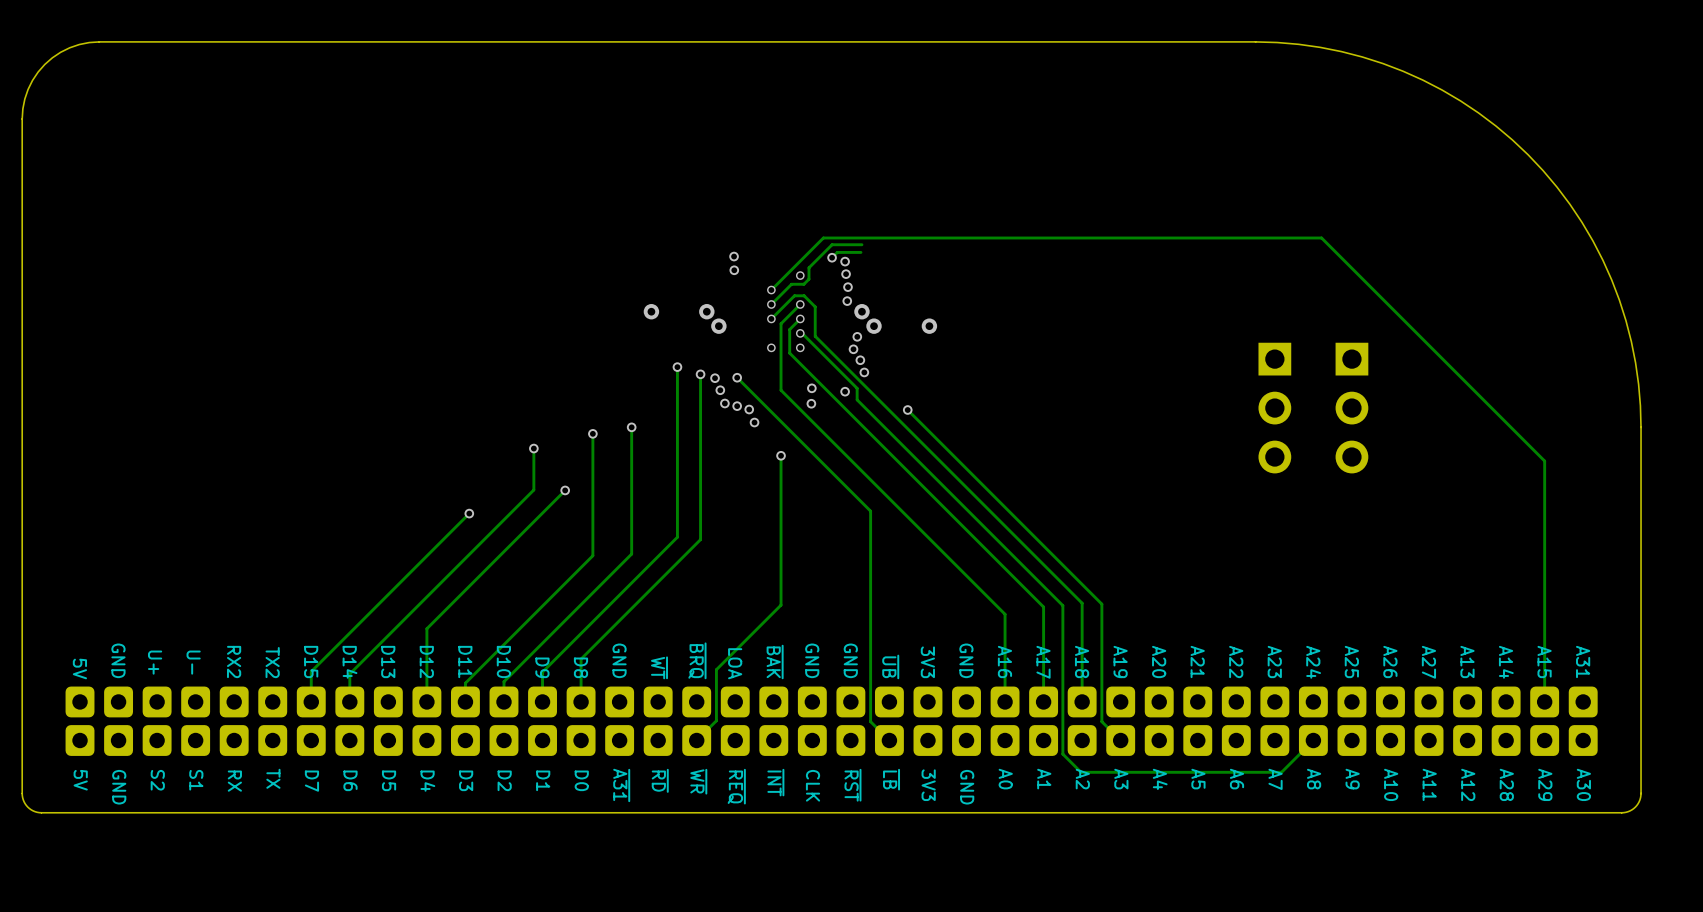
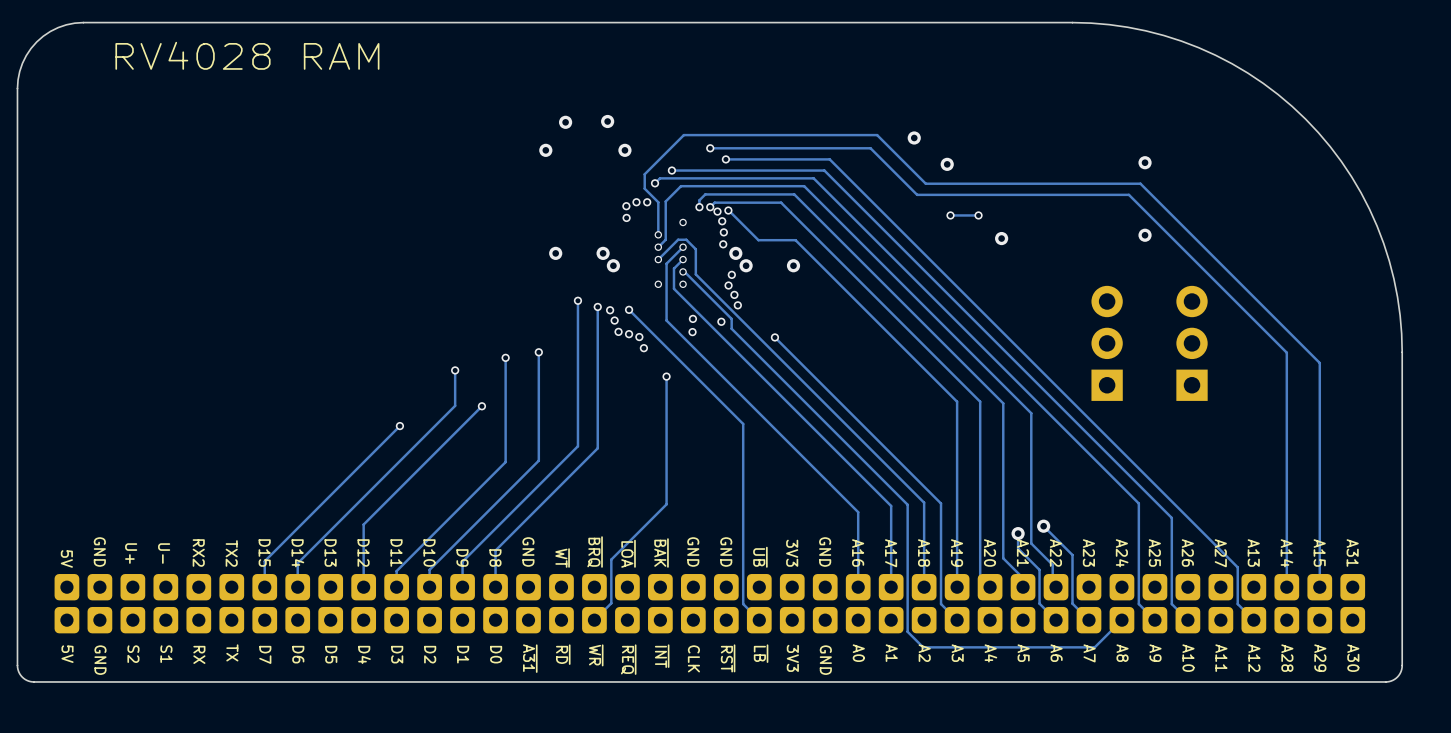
text: none -> RV4028 RAM (247, 55)
via: none -> (607, 121)
via: none -> (565, 122)
via: none -> (914, 137)
track: none -> (710, 148) (870, 148) (917, 194) (1128, 194) (1286, 352) (1286, 587)
via: none -> (710, 148)
via: none -> (545, 150)
via: none -> (624, 150)
track: none -> (725, 159) (829, 159) (1237, 567) (1237, 604) (1253, 620)
via: none -> (725, 159)
via: none -> (1145, 162)
via: none -> (947, 164)
track: none -> (671, 170) (824, 170) (1171, 517) (1171, 604) (1187, 620)
via: none -> (671, 170)
track: none -> (655, 183) (659, 178) (813, 178) (1138, 503) (1138, 604) (1154, 620)
via: none -> (655, 183)
track: (861, 244) (832, 244) (808, 267) (808, 279) (803, 284) (791, 284) (780, 295) -> (1056, 587) (1052, 583) (1052, 564) (1031, 543) (1031, 413) (804, 186) (680, 186) (665, 201) (665, 239)
via: none -> (636, 202)
via: none -> (647, 202)
track: none -> (734, 202) (781, 202) (980, 401) (980, 577) (990, 587)
track: none -> (699, 207) (699, 200) (705, 194) (794, 194) (1003, 403) (1003, 558) (1023, 578) (1023, 587)
via: none -> (699, 207)
via: (845, 261) -> none
track: none -> (728, 210) (758, 240) (795, 240) (957, 401) (957, 587)
via: none -> (728, 210)
via: none -> (717, 211)
via: none -> (950, 215)
track: none -> (978, 215) (950, 215)
via: none -> (978, 215)
track: (771, 290) (823, 238) (1321, 238) (1544, 461) -> (658, 234) (658, 202) (644, 188) (644, 174) (683, 135) (877, 135) (925, 183) (1140, 183) (1319, 363) (1319, 381)
via: none -> (1145, 235)
via: none -> (1001, 238)
part: (1274, 408) -> none
part: (1351, 408) -> none
part: none -> (1107, 343)
part: none -> (1192, 343)
track: none -> (1043, 526) (1072, 555) (1072, 603) (1088, 620)
via: none -> (1043, 526)
track: none -> (1018, 533) (1018, 548) (1039, 569) (1039, 603) (1056, 620)
via: none -> (1018, 533)
part text: LOA (735, 663) -> ~{LOA} (628, 553)

